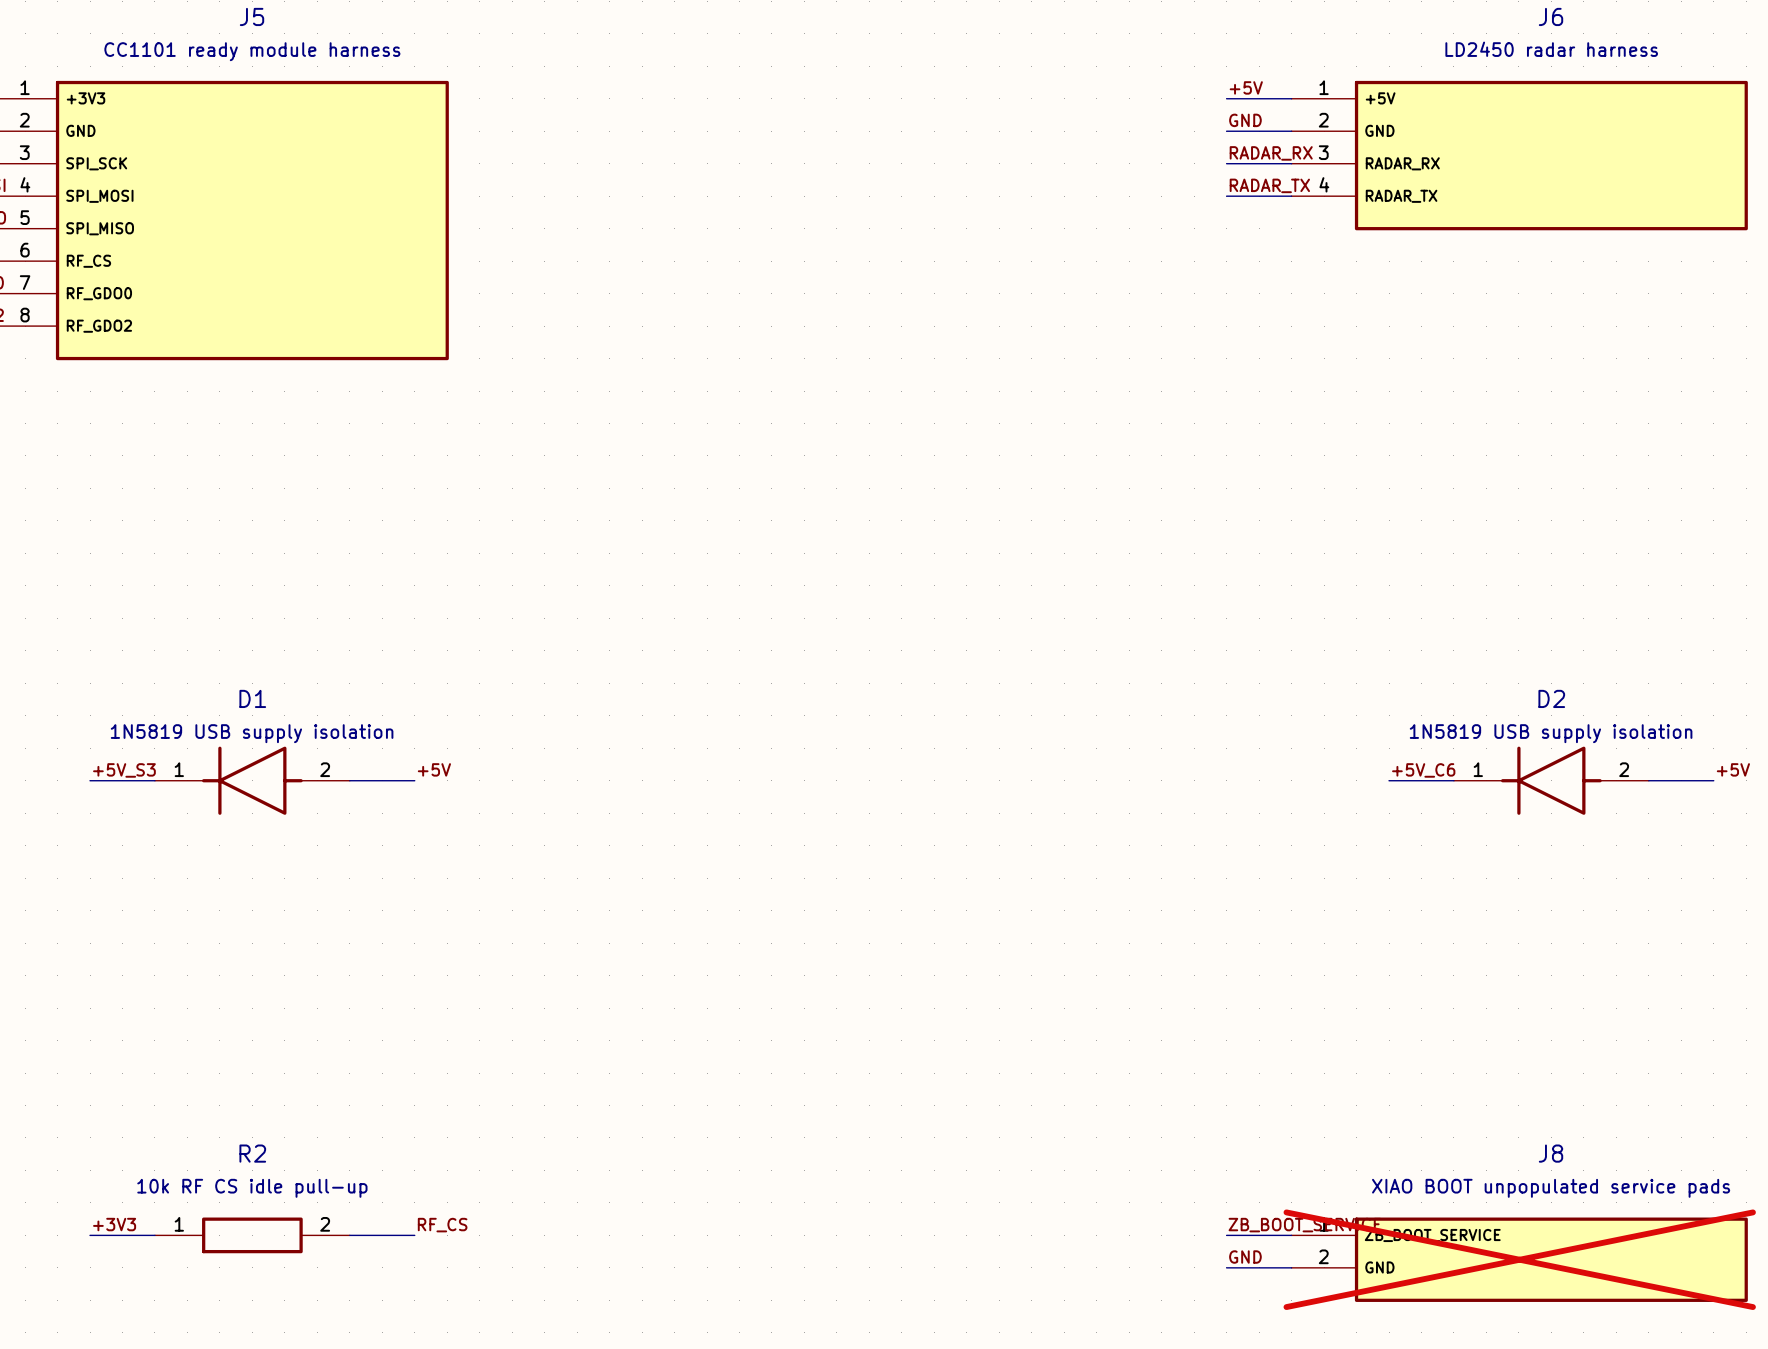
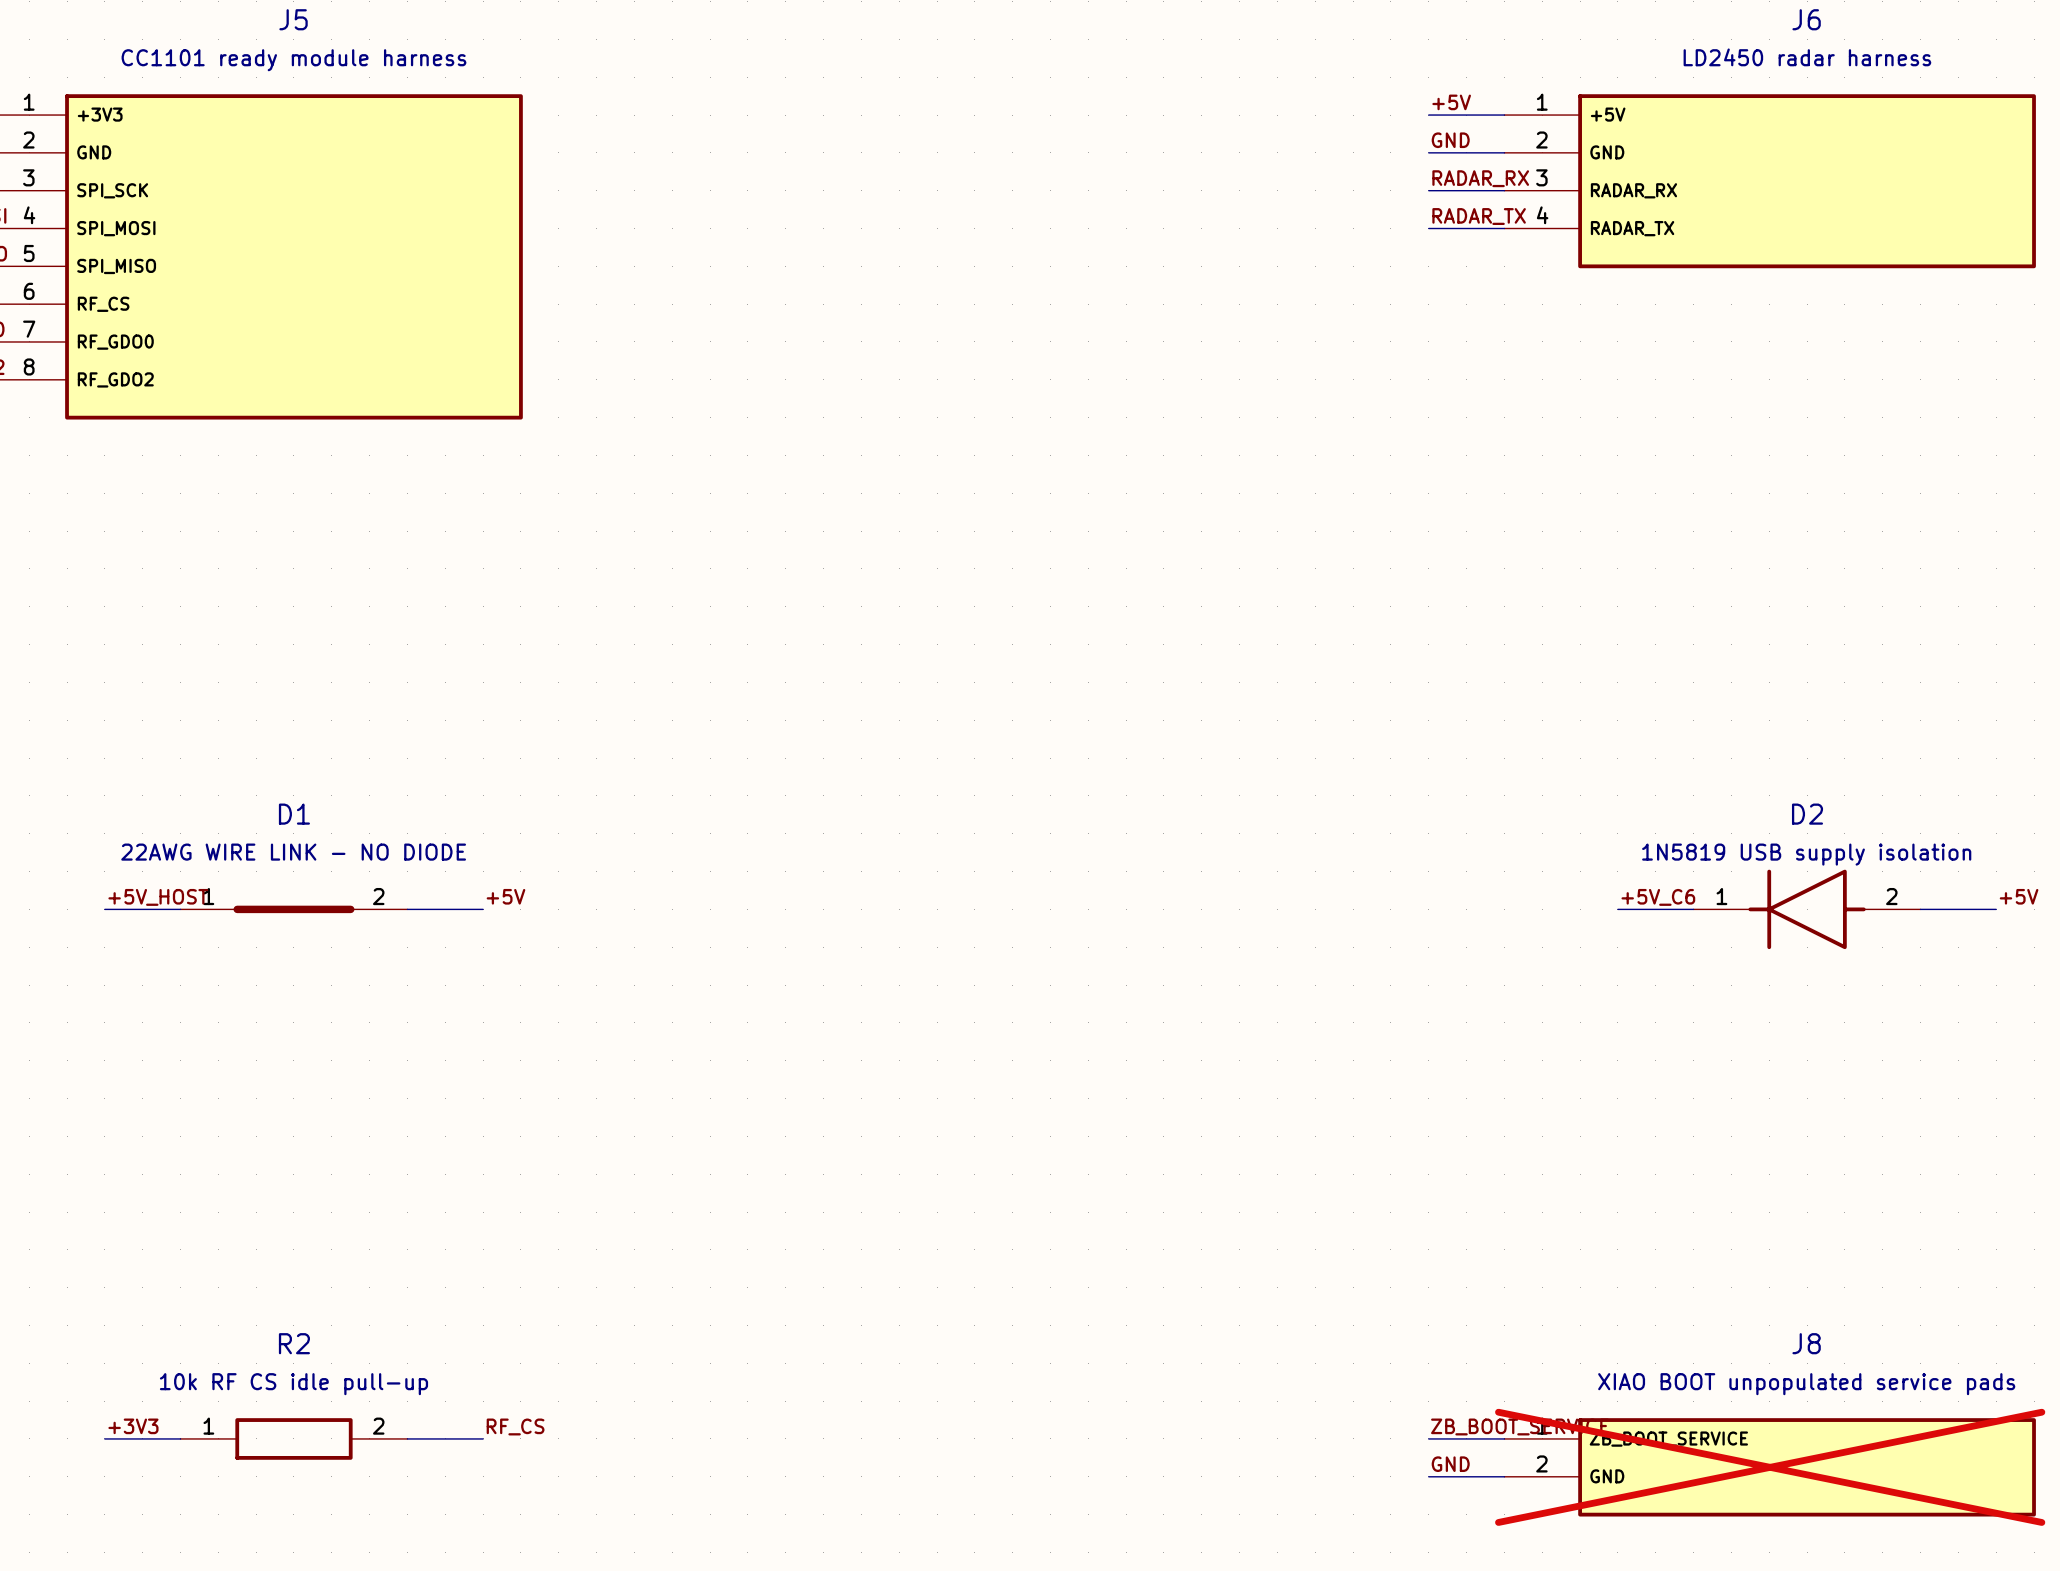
D1 value: 1N5819 USB supply isolation (252, 733) -> 22AWG WIRE LINK - NO DIODE (293, 852)
D1 symbol: [154, 746, 350, 815] -> [180, 905, 408, 914]
label: +5V_S3 (124, 770) -> +5V_HOST (158, 897)

